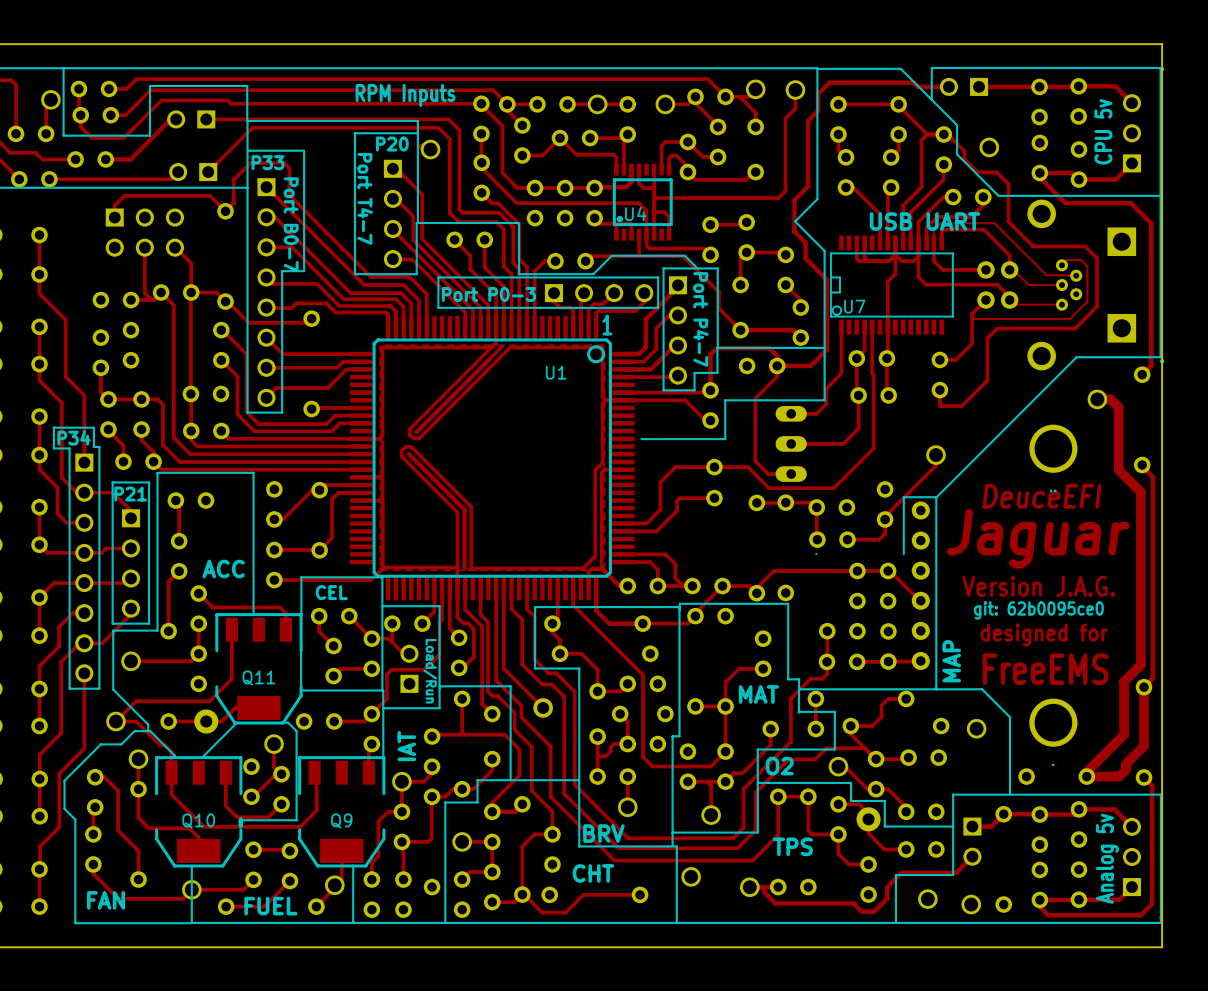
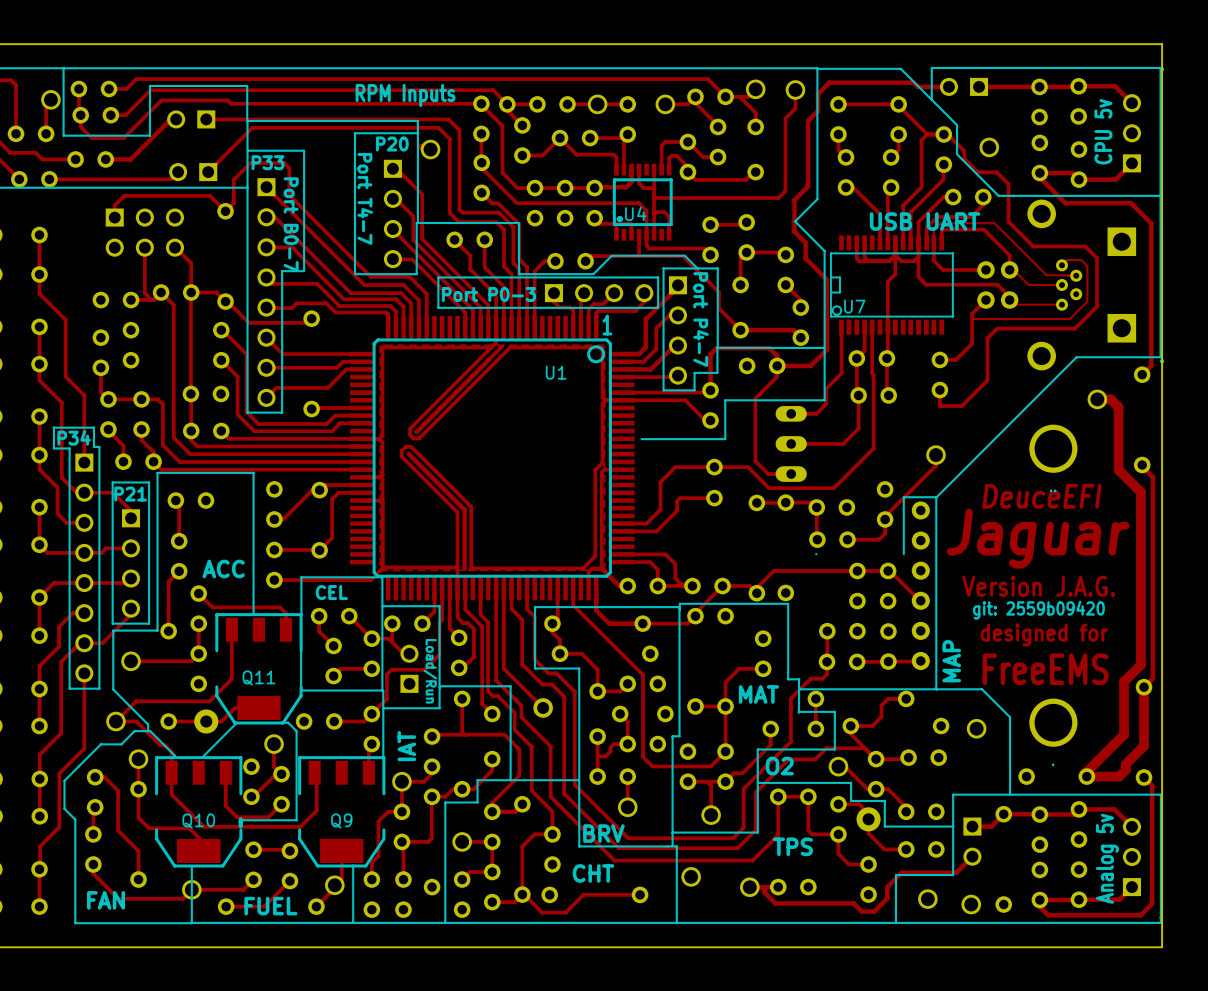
text: git: 62b0095ce0 (1038, 610) -> git: 2559b09420 (1038, 610)

